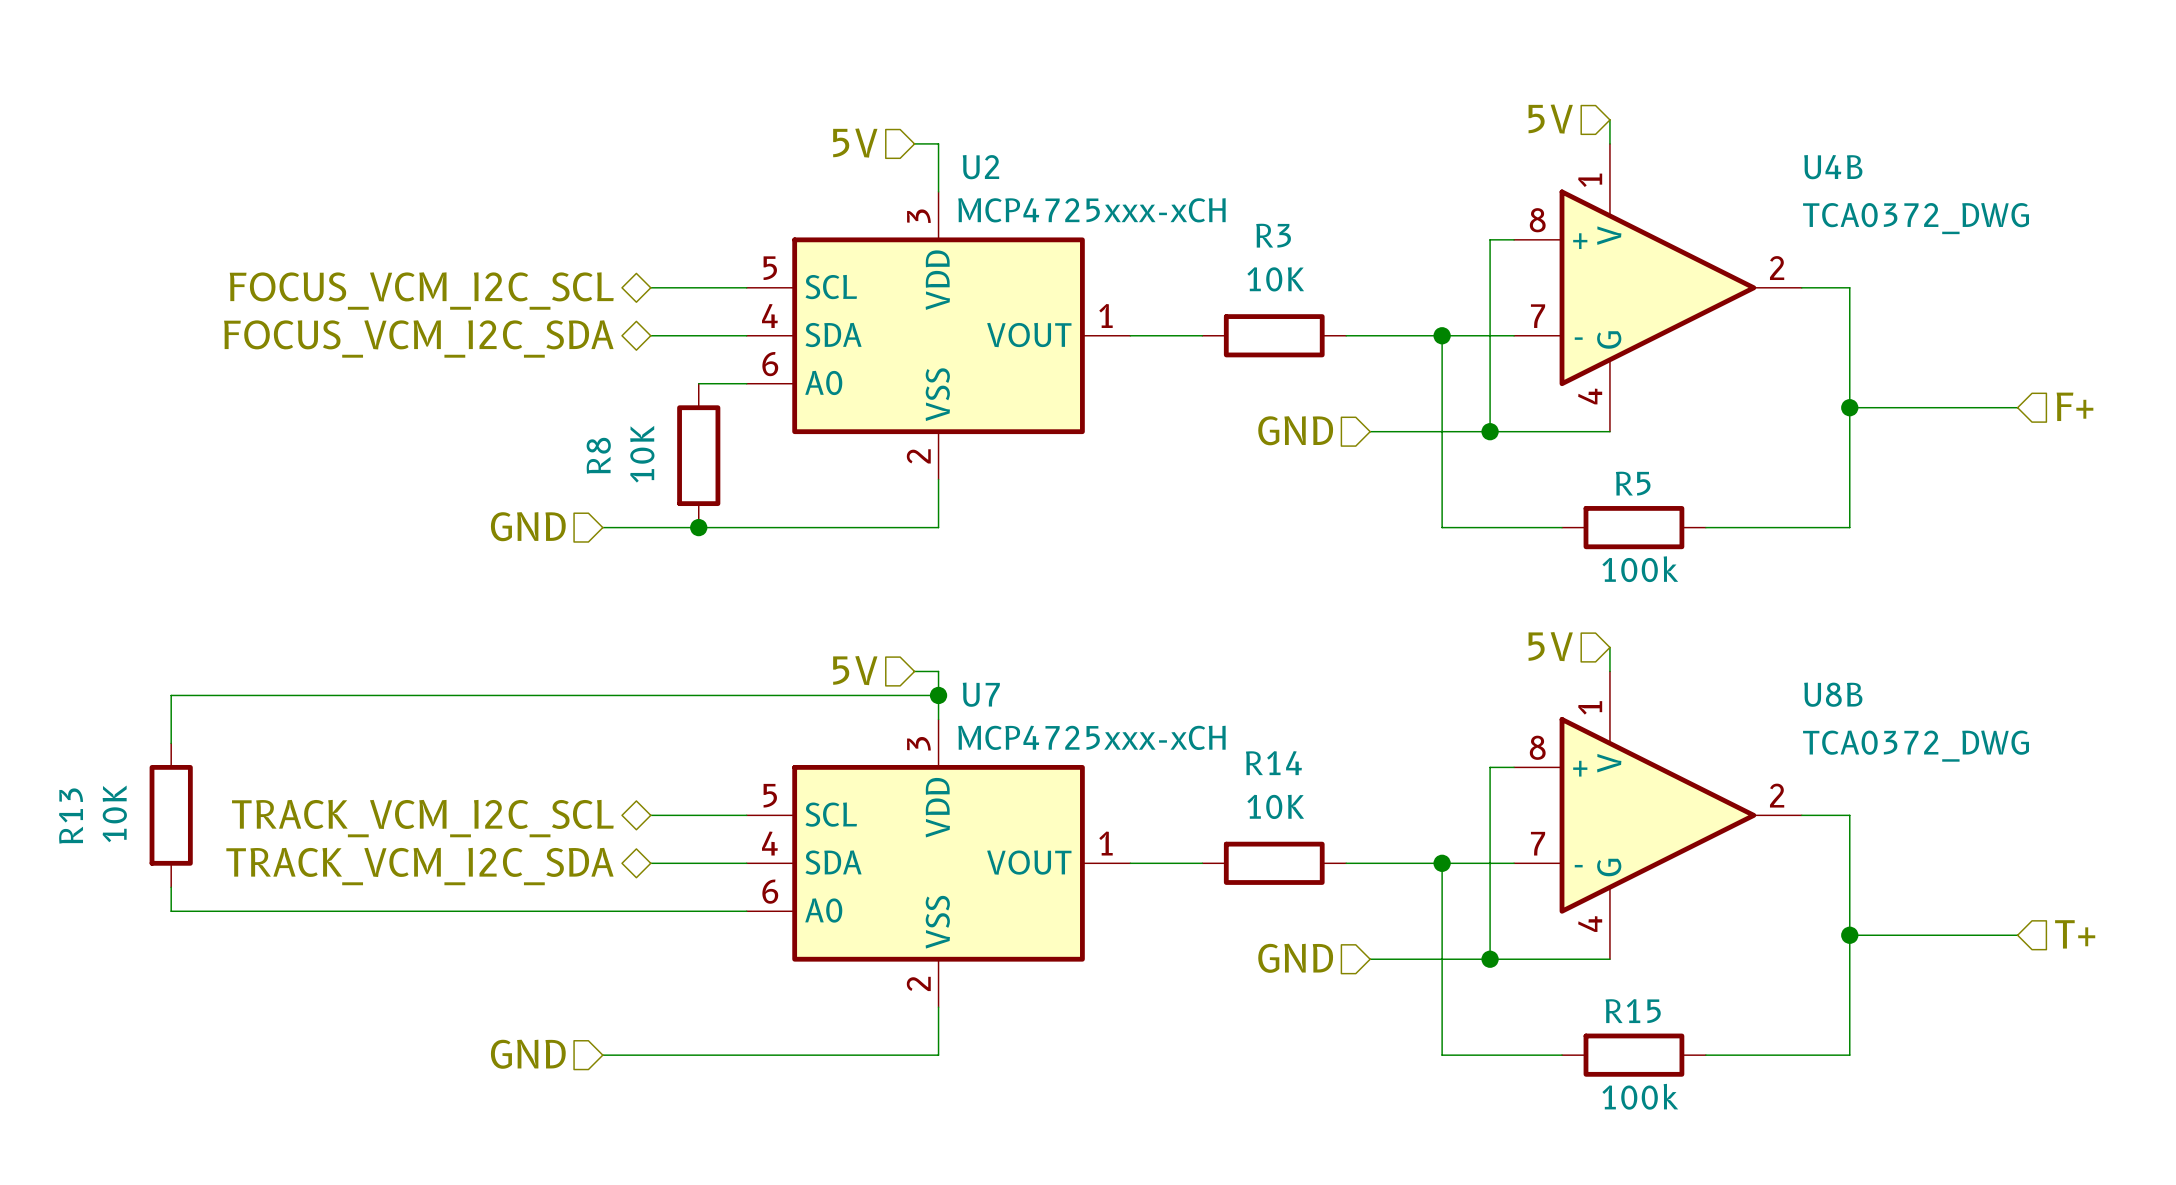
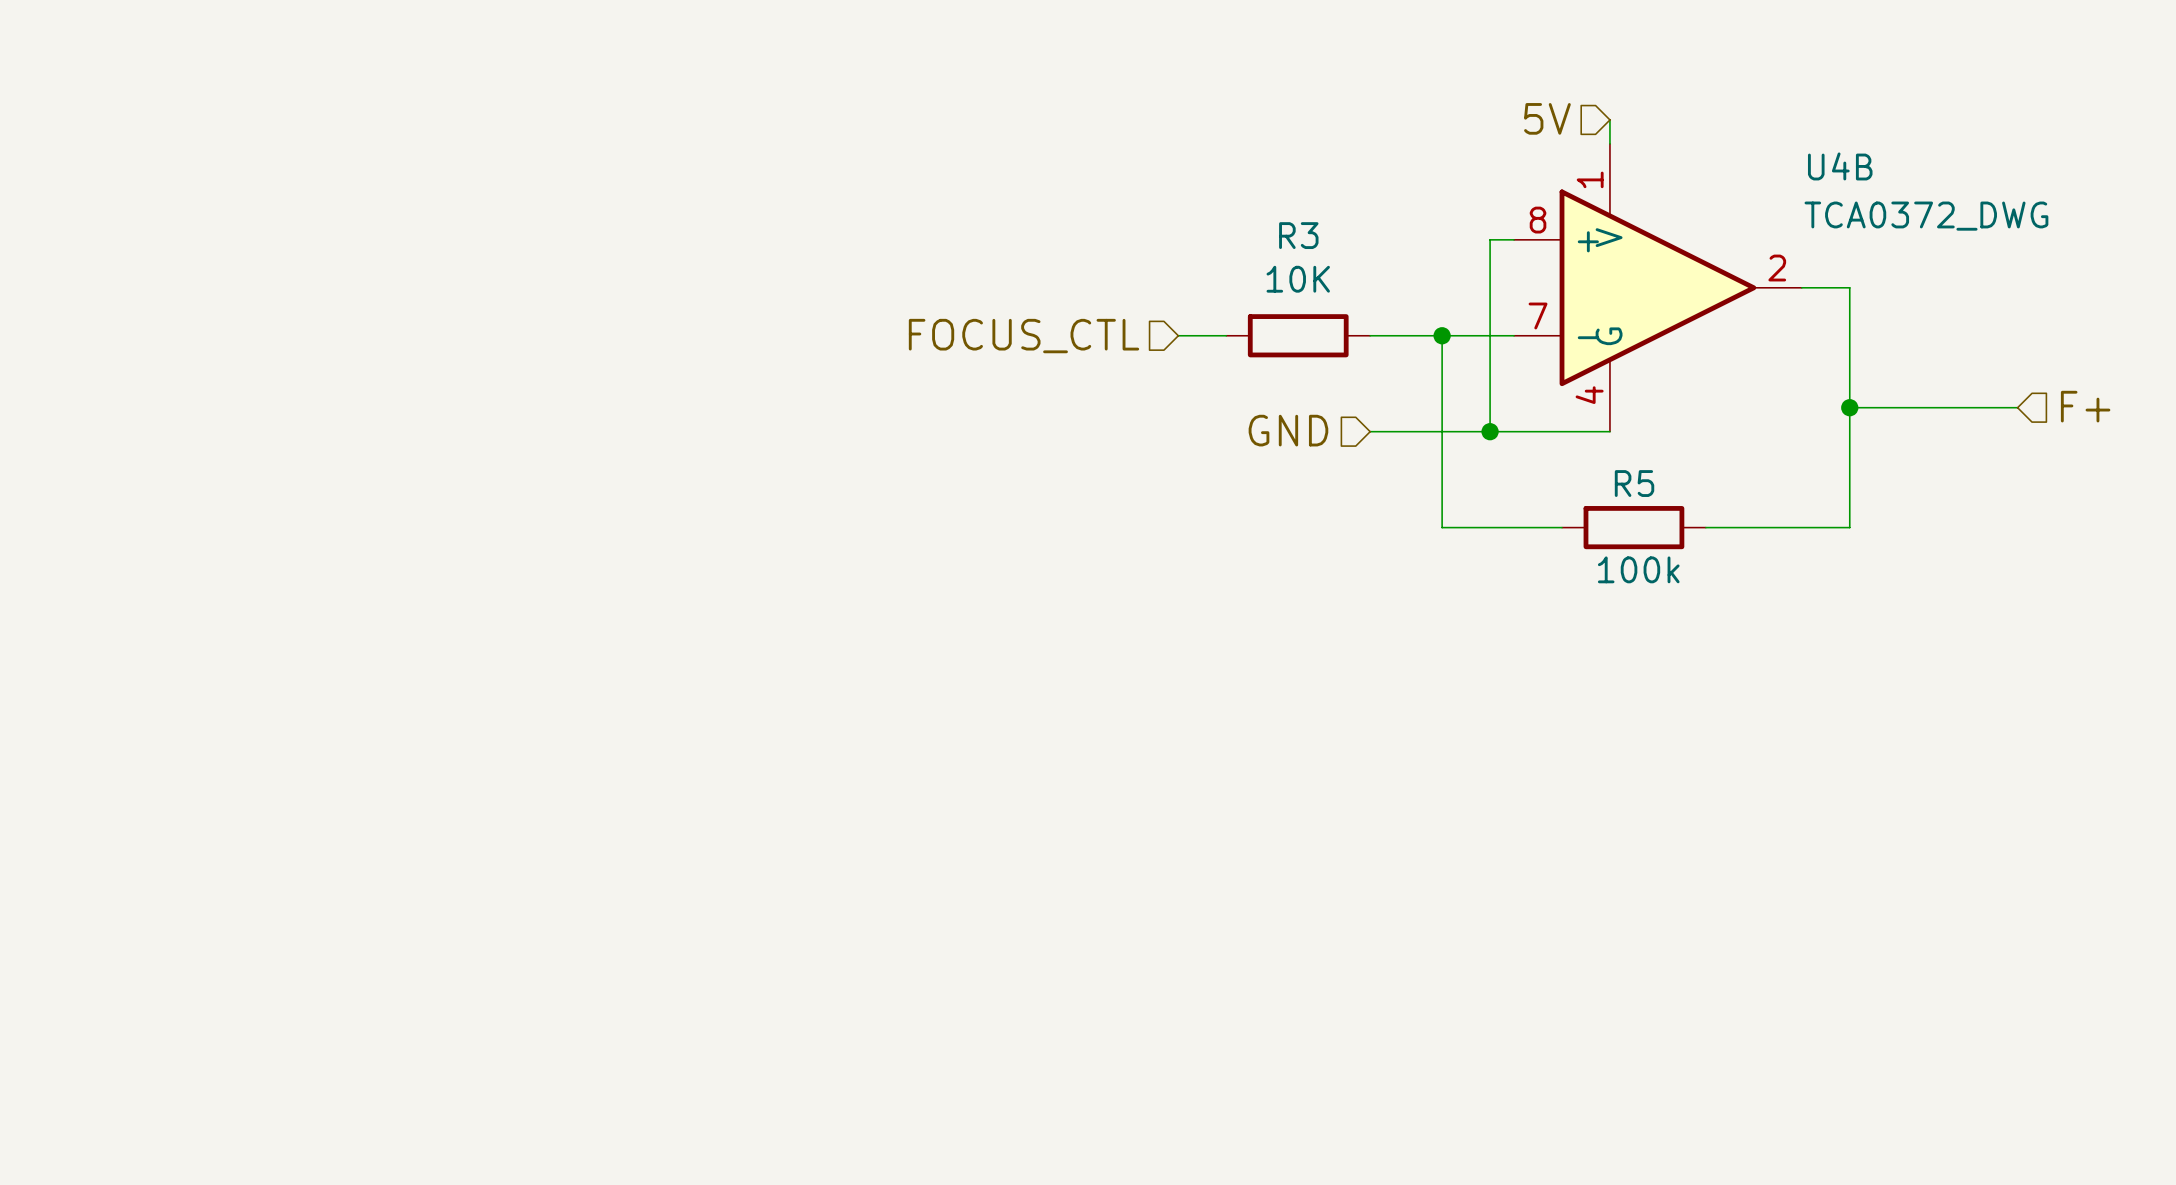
hierarchical label: 5V (855, 143) -> none
wire: (914, 143) (938, 143) (938, 191) -> none
wire: (650, 287) (746, 287) -> none
hierarchical label: FOCUS_VCM_I2C_SCL (421, 291) -> none
wire: (650, 335) (746, 335) -> none
U2: MCP4725xxx-xCH (938, 335) -> none
wire: (1130, 335) (1178, 335) -> none
R3 position: (1274, 335) -> (1298, 335)
hierarchical label: FOCUS_VCM_I2C_SDA (418, 338) -> none
hierarchical label: none -> FOCUS_CTL (1024, 336)
wire: (698, 383) (746, 383) -> none
R8: 10K (698, 455) -> none
wire: (938, 479) (938, 527) (602, 527) -> none
hierarchical label: GND (528, 526) -> none
junction: (698, 527) -> none
hierarchical label: 5V (1550, 646) -> none
wire: (1609, 647) (1609, 671) -> none
hierarchical label: 5V (855, 670) -> none
wire: (914, 671) (938, 671) (938, 719) -> none
wire: (938, 695) (171, 695) (171, 743) -> none
junction: (938, 695) -> none
wire: (1514, 767) (1490, 767) (1490, 959) -> none
R13: 10K (171, 815) -> none
wire: (650, 815) (746, 815) -> none
U8B: TCA0372_DWG (1657, 815) -> none
wire: (1801, 815) (1849, 815) (1849, 1055) (1705, 1055) -> none
hierarchical label: TRACK_VCM_I2C_SCL (422, 818) -> none
wire: (650, 863) (746, 863) -> none
U7: MCP4725xxx-xCH (938, 863) -> none
wire: (1130, 863) (1202, 863) -> none
R14: 10K (1274, 863) -> none
wire: (1346, 863) (1514, 863) -> none
wire: (1442, 863) (1442, 1055) (1562, 1055) -> none
junction: (1442, 863) -> none
hierarchical label: TRACK_VCM_I2C_SDA (419, 866) -> none
wire: (171, 887) (171, 911) (746, 911) -> none
hierarchical label: T+ (2075, 934) -> none
wire: (1849, 935) (2017, 935) -> none
junction: (1849, 935) -> none
hierarchical label: GND (1295, 958) -> none
wire: (1370, 959) (1609, 959) -> none
junction: (1490, 959) -> none
wire: (938, 1007) (938, 1055) (602, 1055) -> none
hierarchical label: GND (528, 1054) -> none
R15: 100k (1633, 1055) -> none

